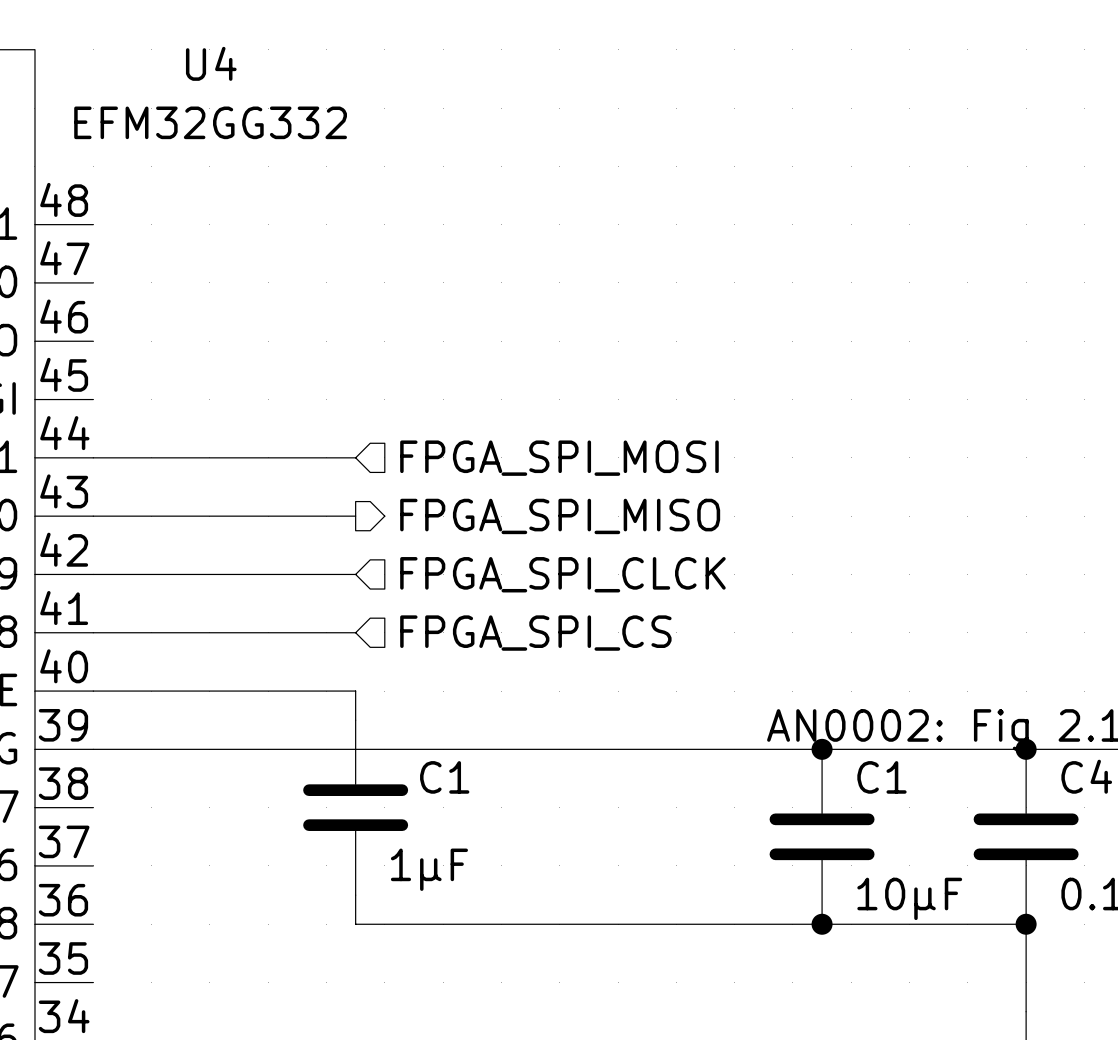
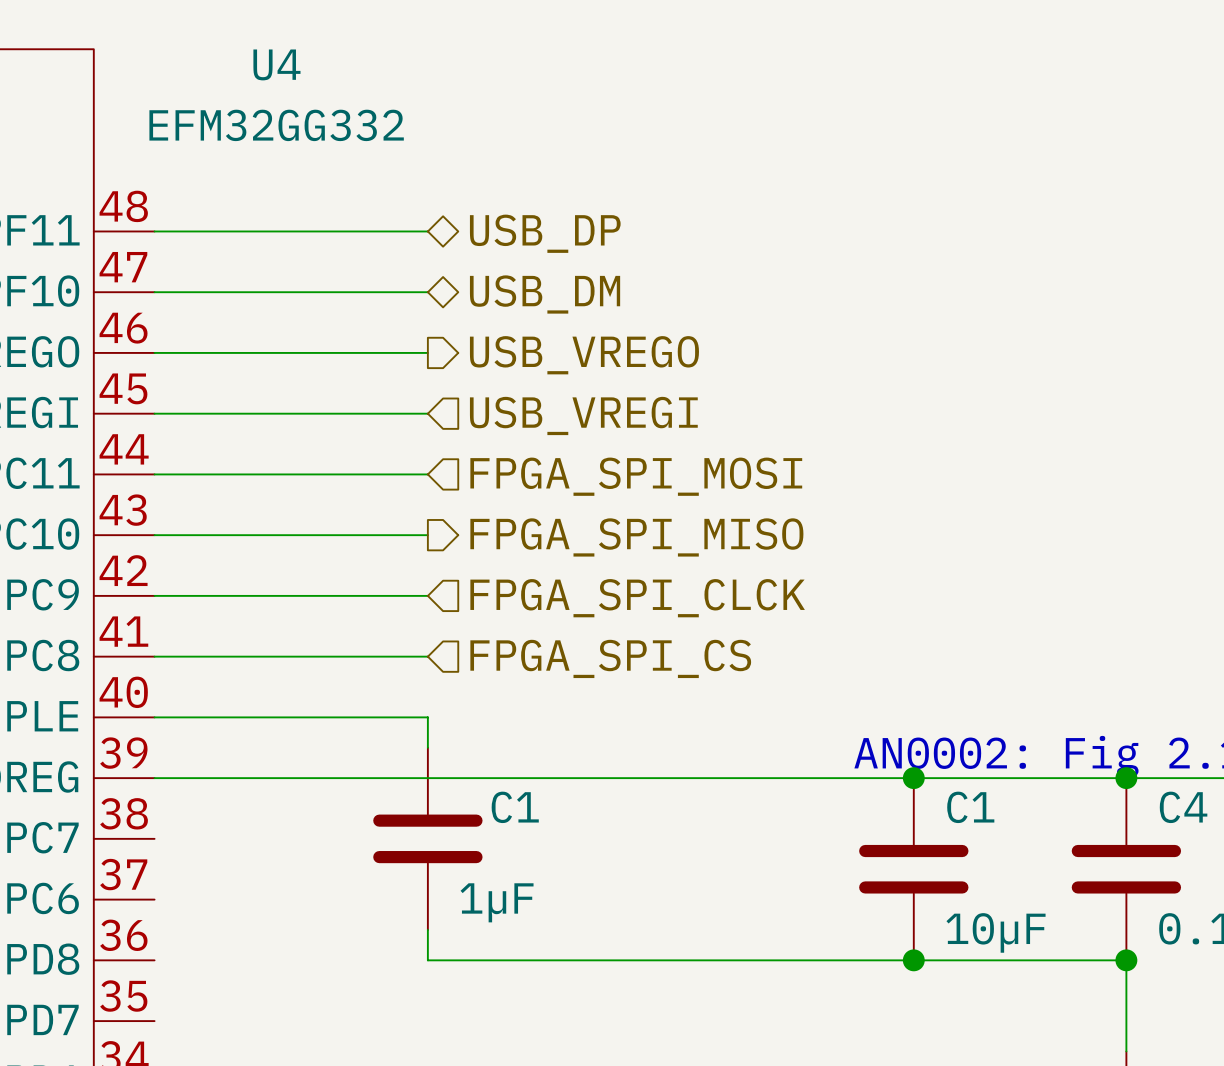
wire: none -> (154, 231) (427, 231)
hierarchical label: none -> USB_DP (545, 233)
wire: none -> (154, 292) (427, 292)
hierarchical label: none -> USB_DM (545, 294)
wire: none -> (154, 352) (427, 352)
hierarchical label: none -> USB_VREGO (584, 355)
wire: none -> (154, 413) (427, 413)
hierarchical label: none -> USB_VREGI (583, 415)

